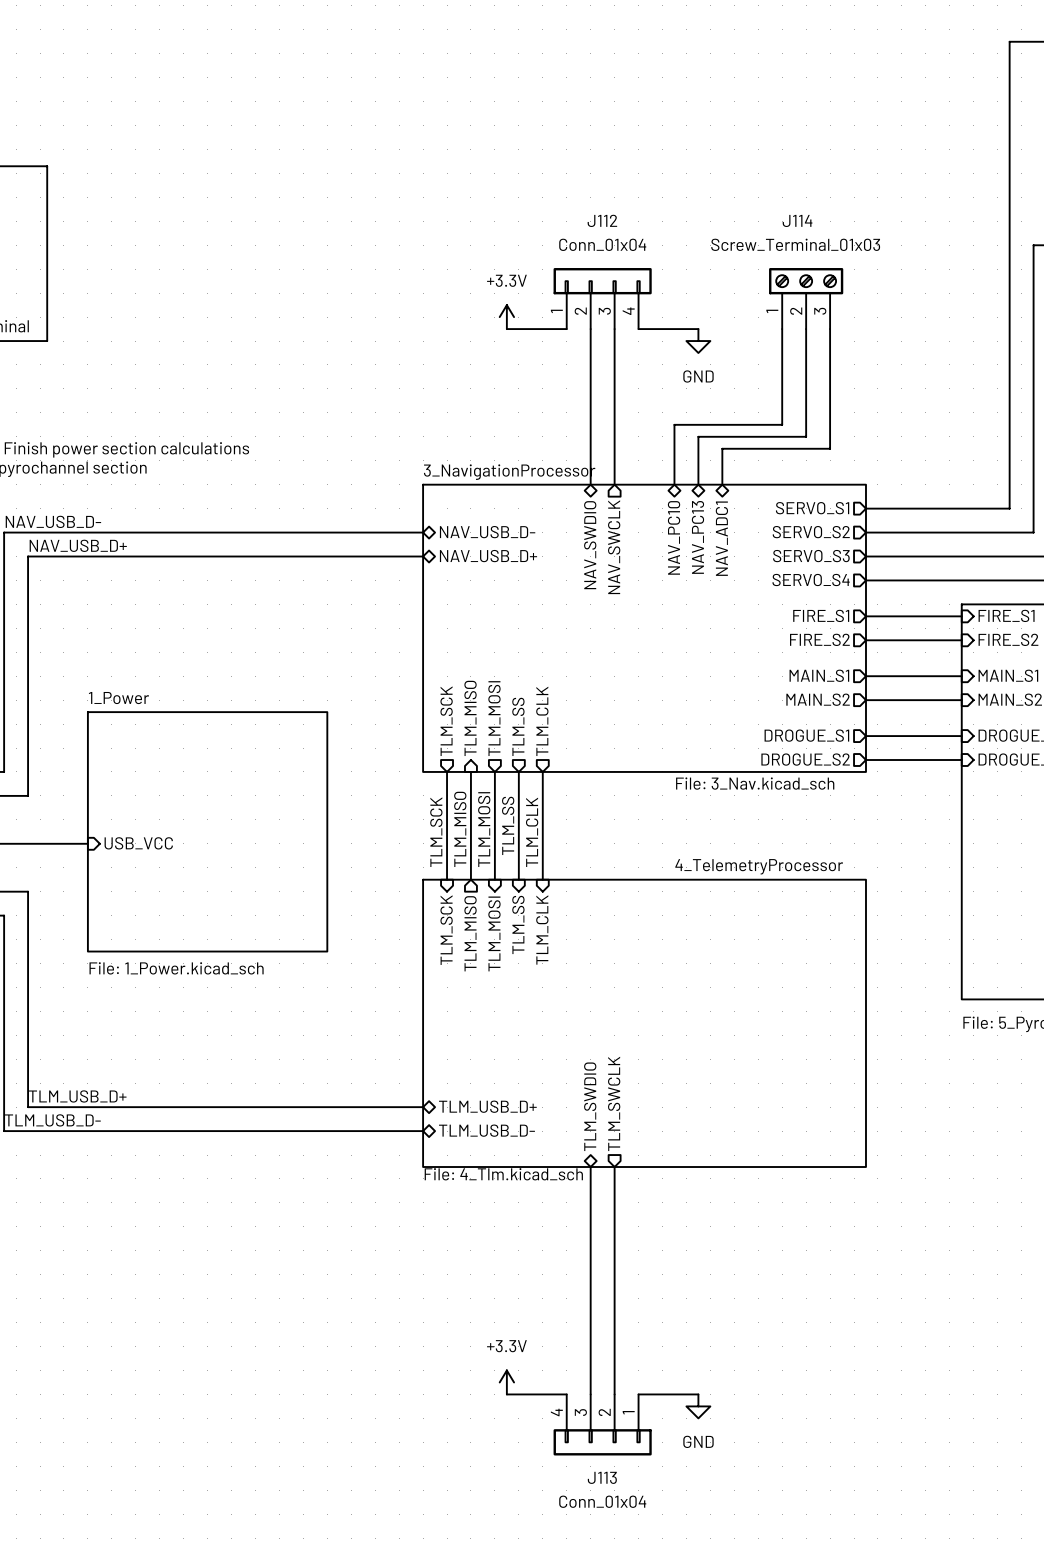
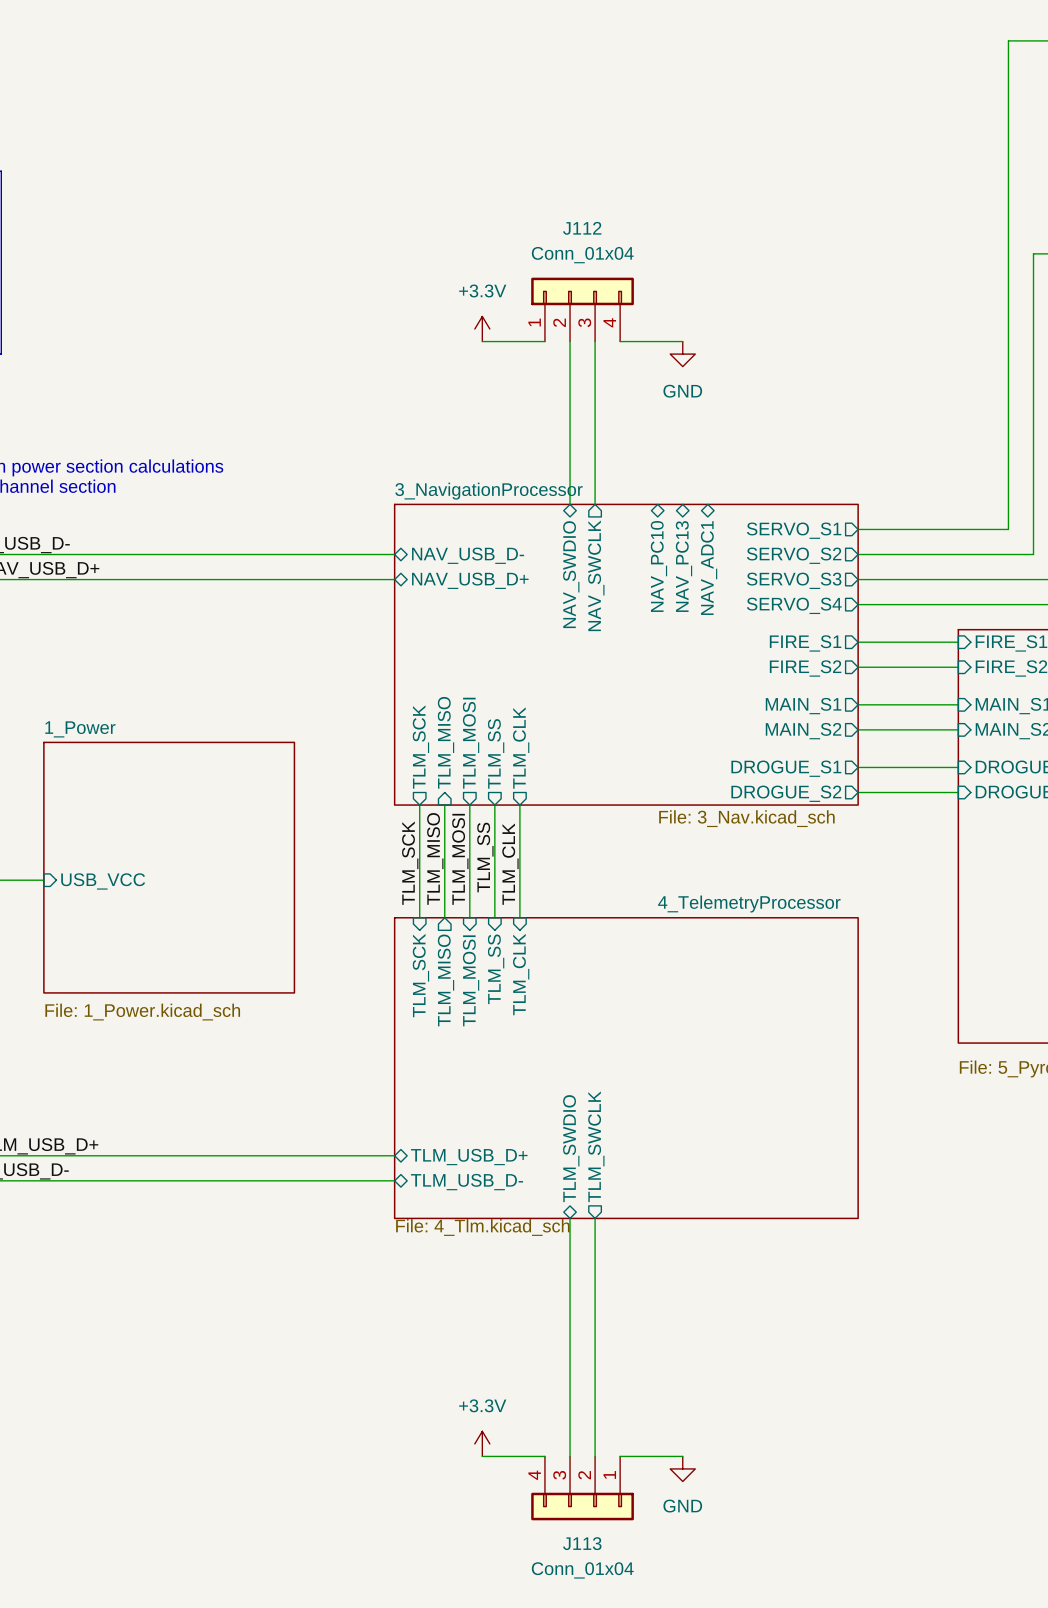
J114: Screw_Terminal_01x03 (806, 298) -> none
wire: (782, 329) (782, 424) (674, 424) (674, 484) -> none
wire: (806, 329) (806, 436) (698, 436) (698, 484) -> none
wire: (830, 329) (830, 448) (722, 448) (722, 484) -> none

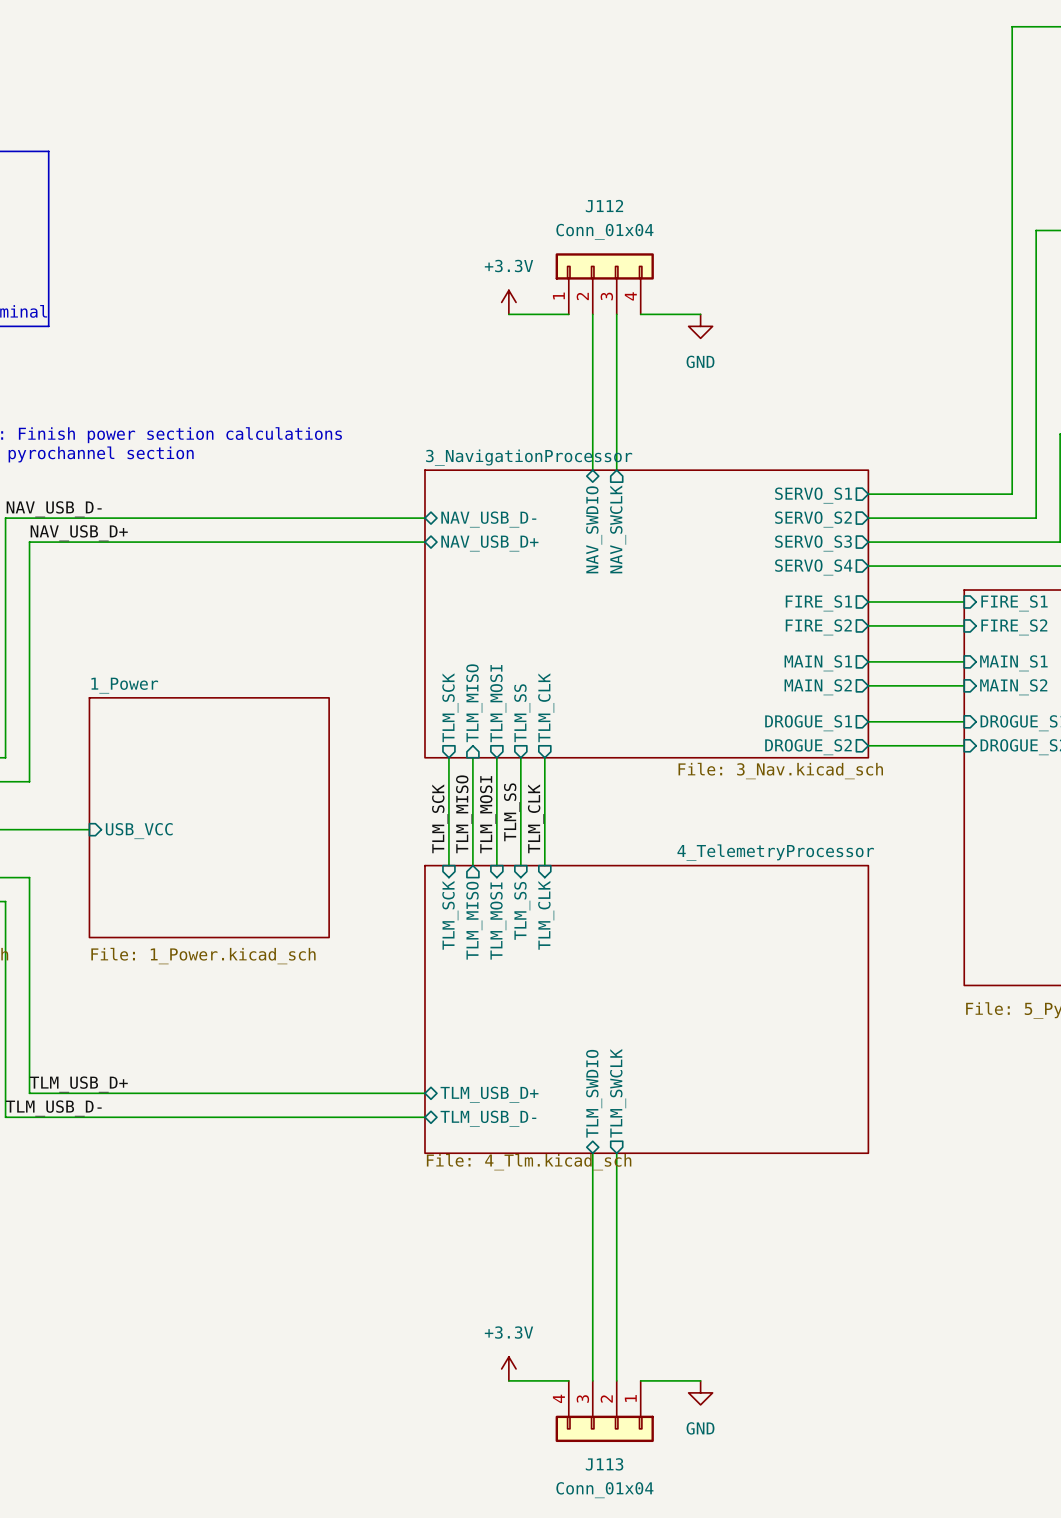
sheet pin: NAV_PC10 (658, 566) -> none
sheet pin: NAV_PC13 (684, 566) -> none
sheet pin: NAV_ADC1 (709, 568) -> none

